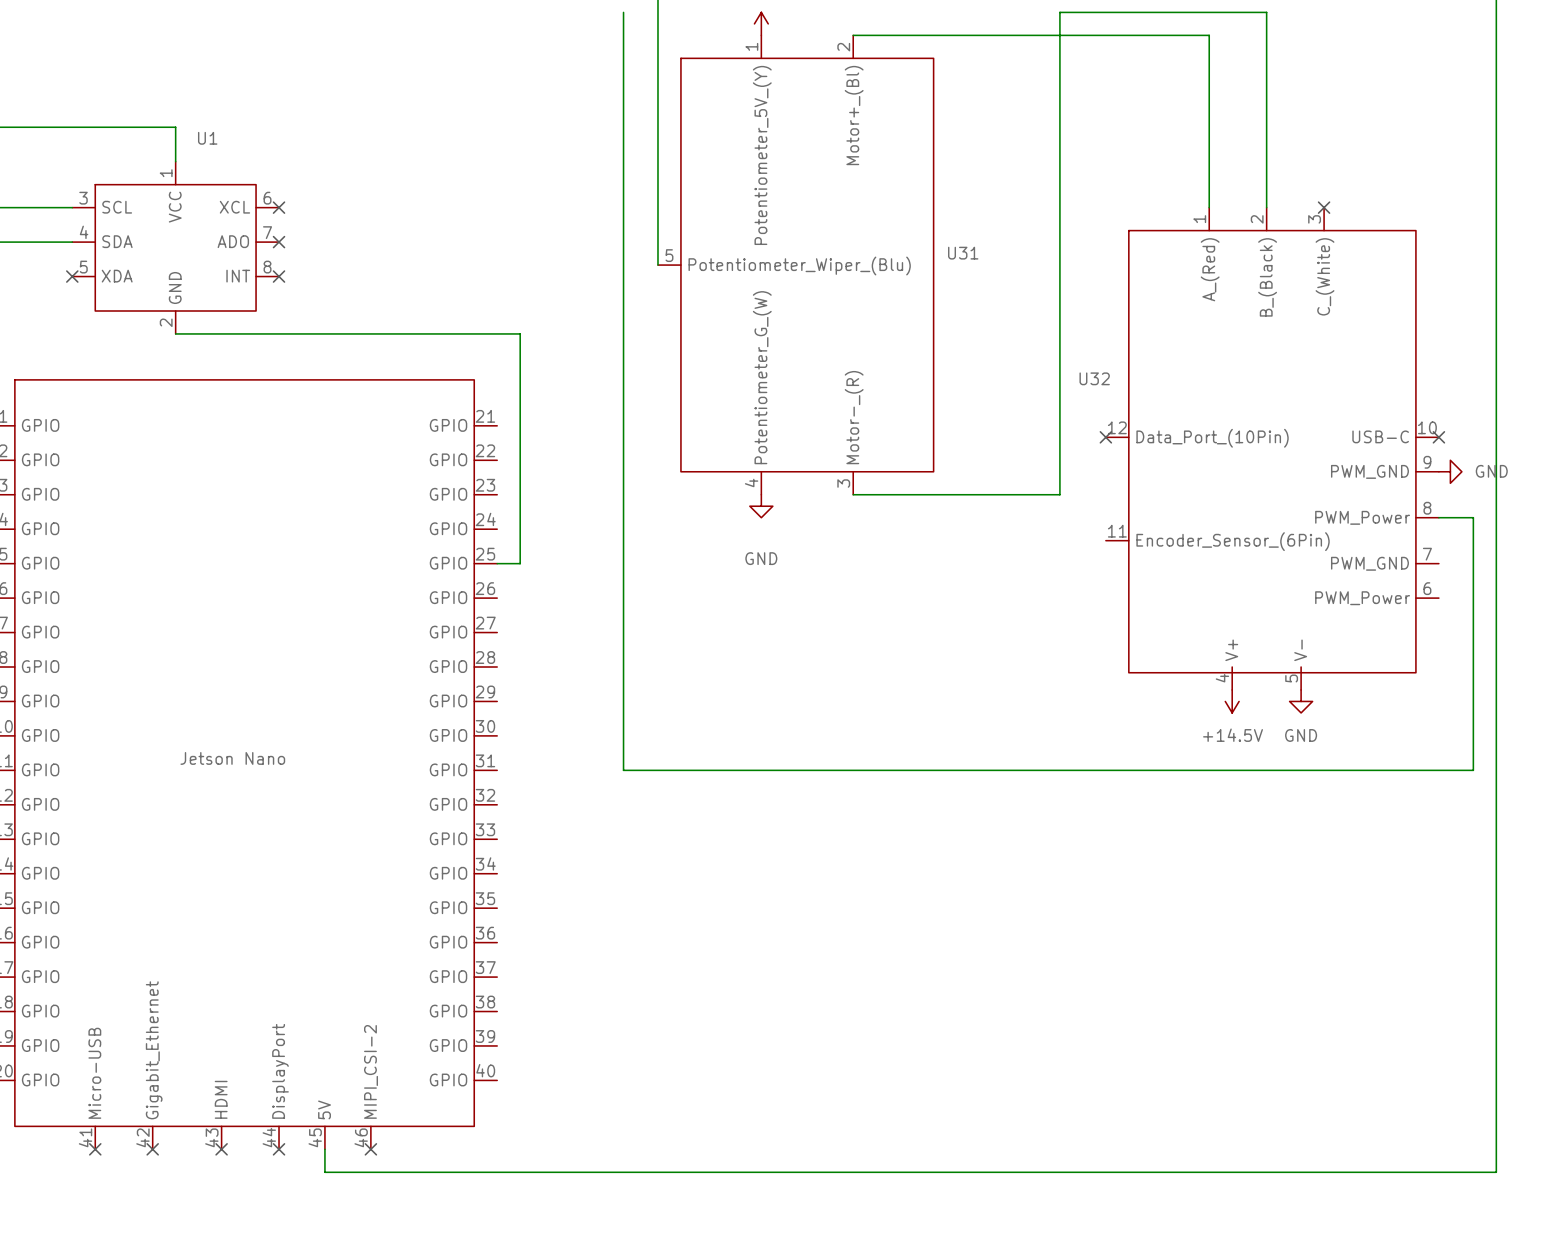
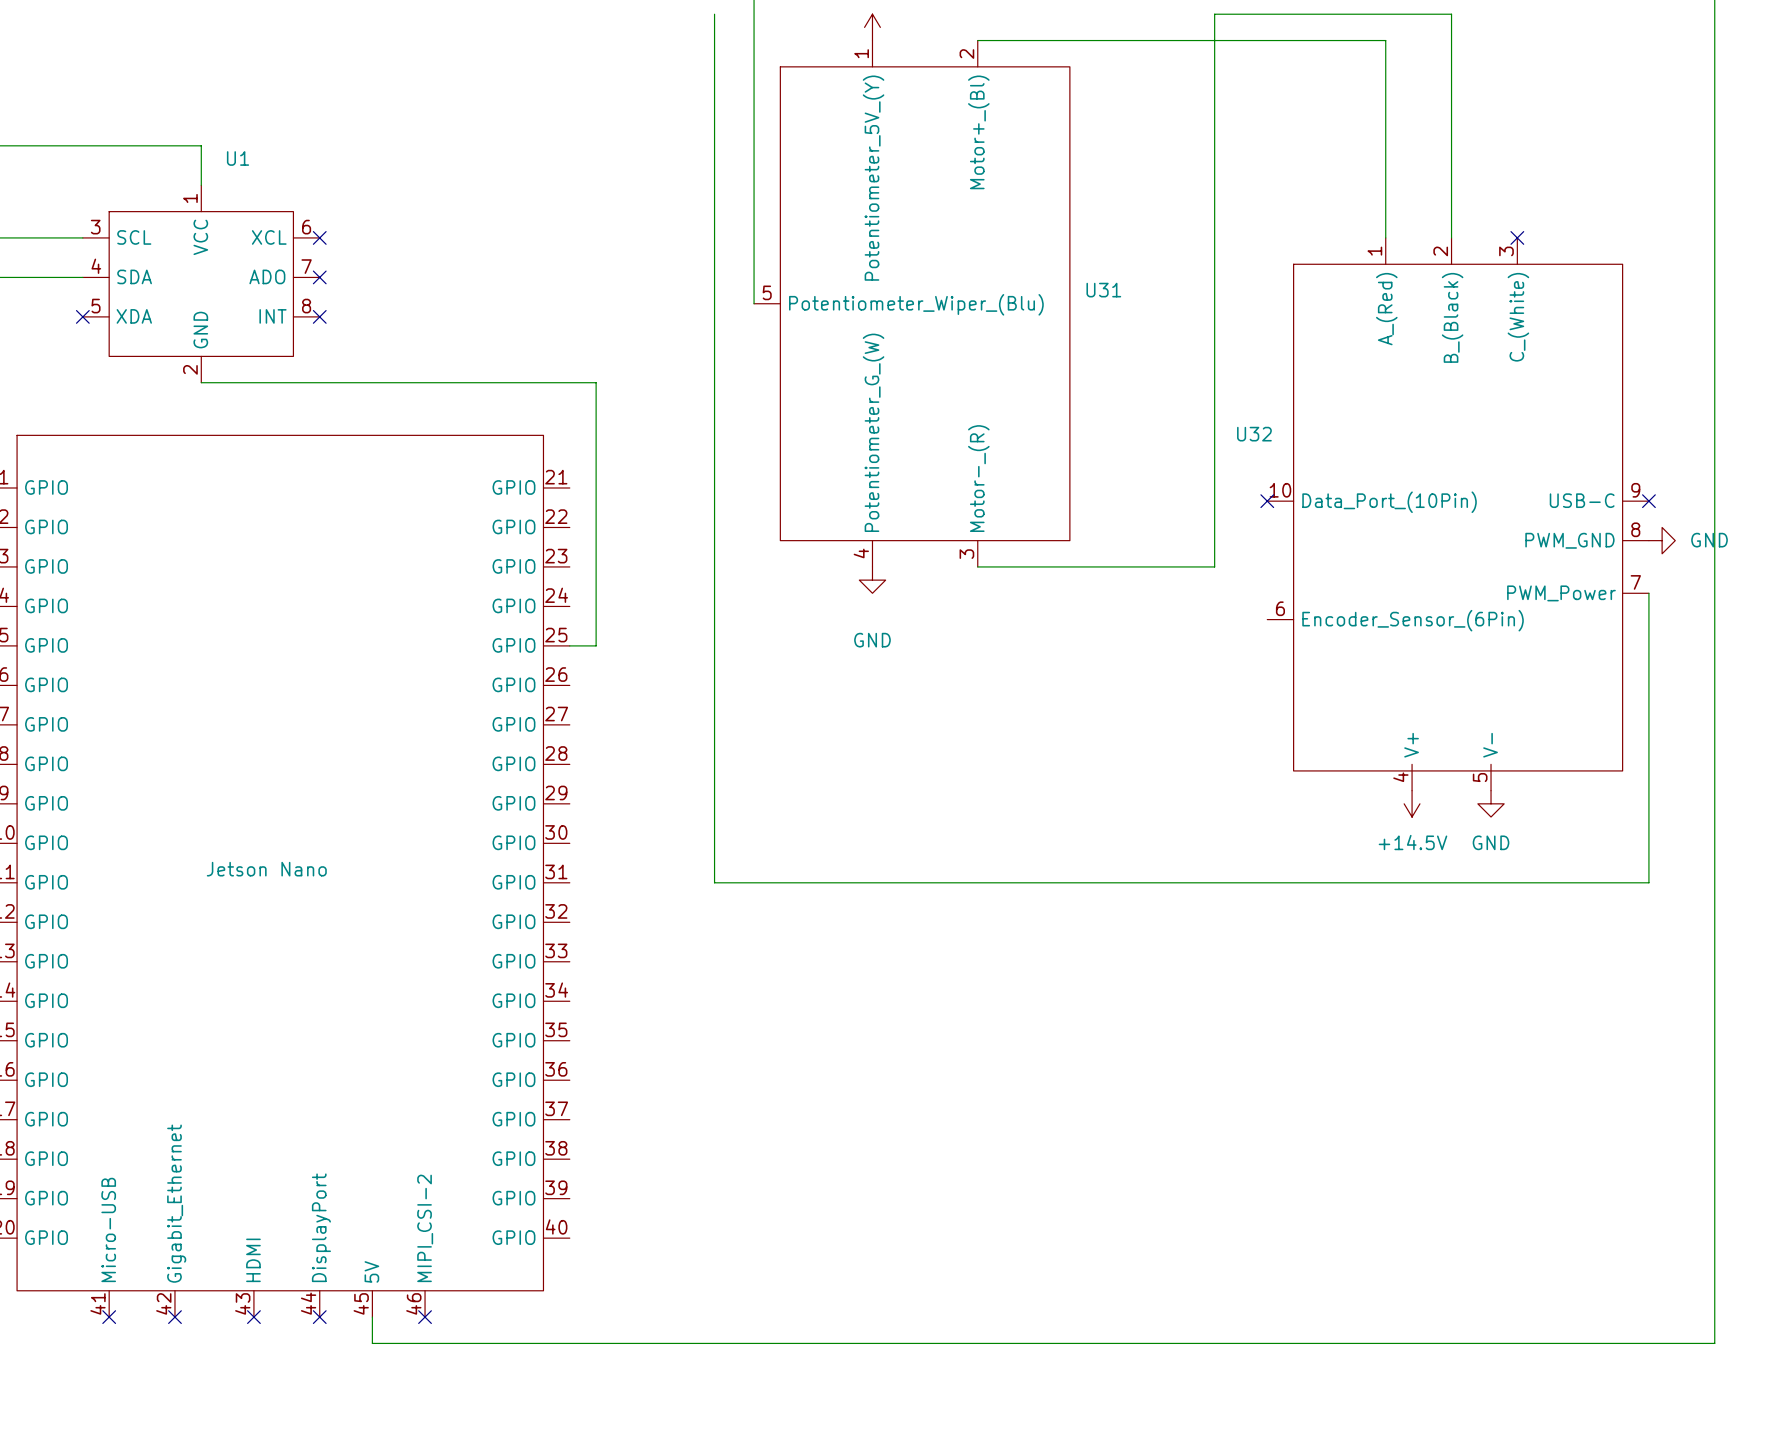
U32 symbol: [1105, 207, 1439, 690] -> [1267, 237, 1649, 791]
wire: (1438, 517) (1473, 517) (1473, 770) (1438, 770) -> (1648, 593) (1648, 882)

